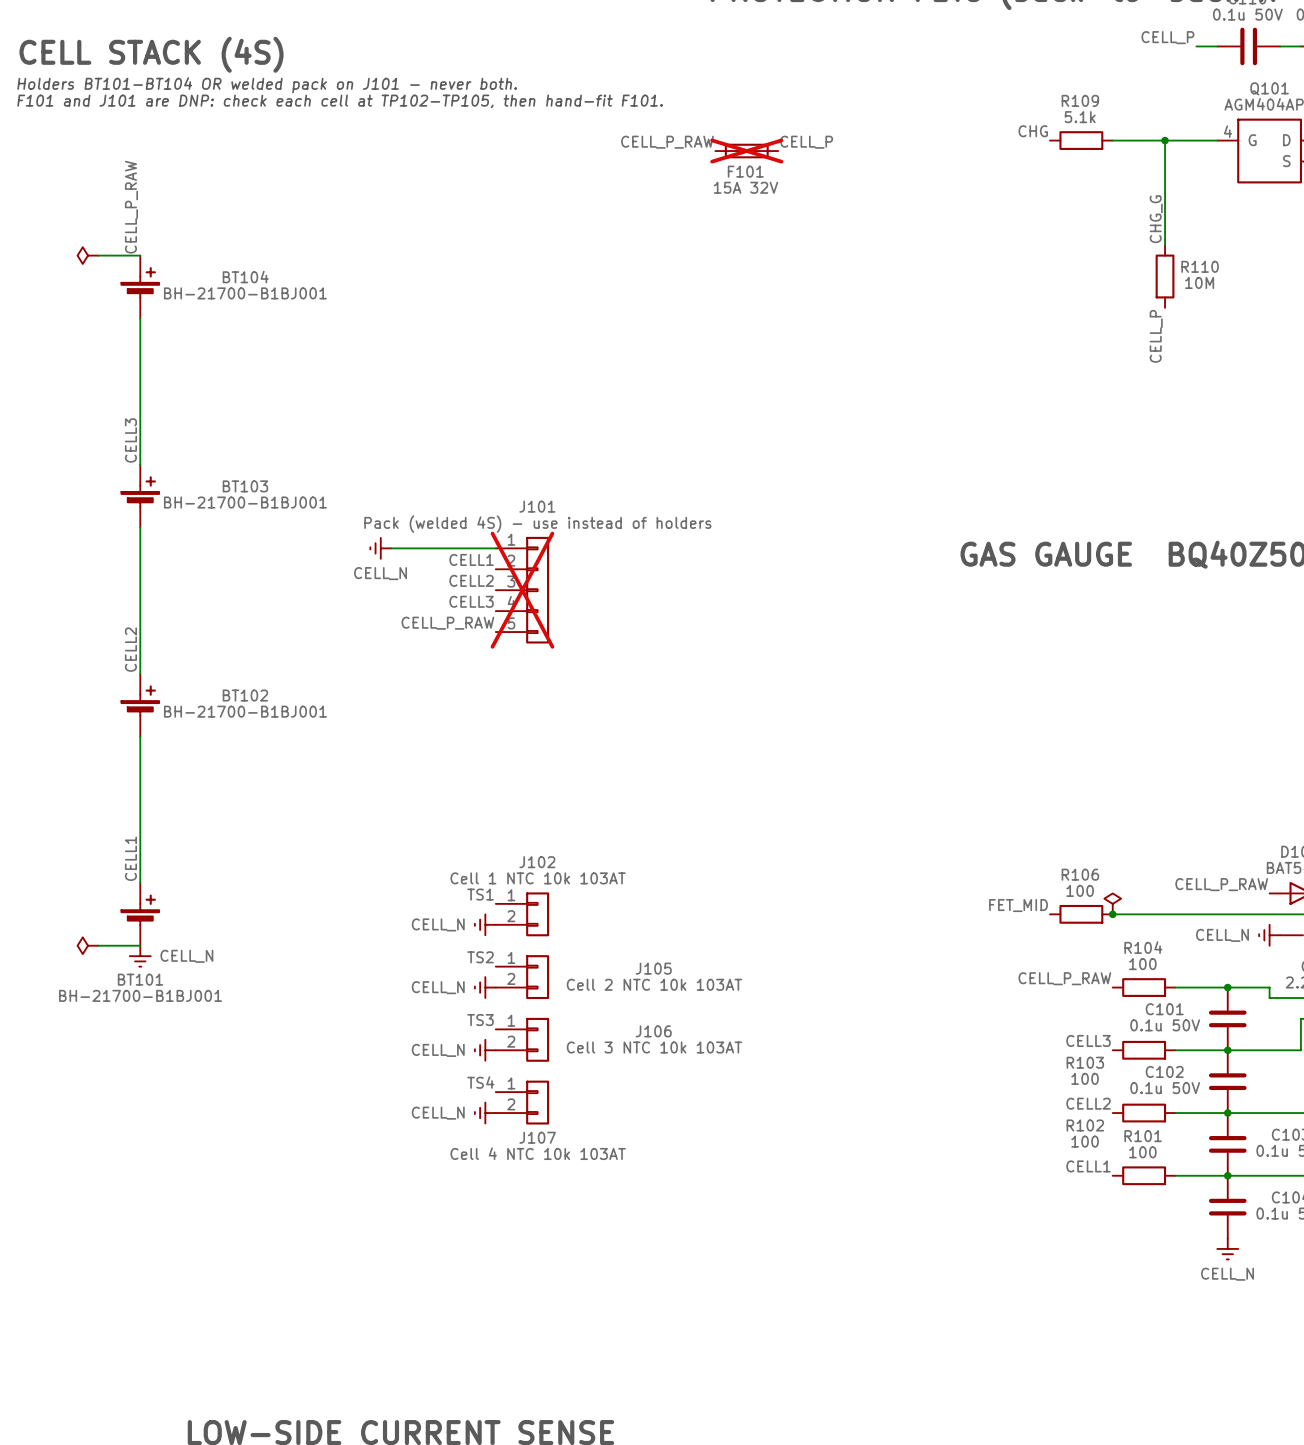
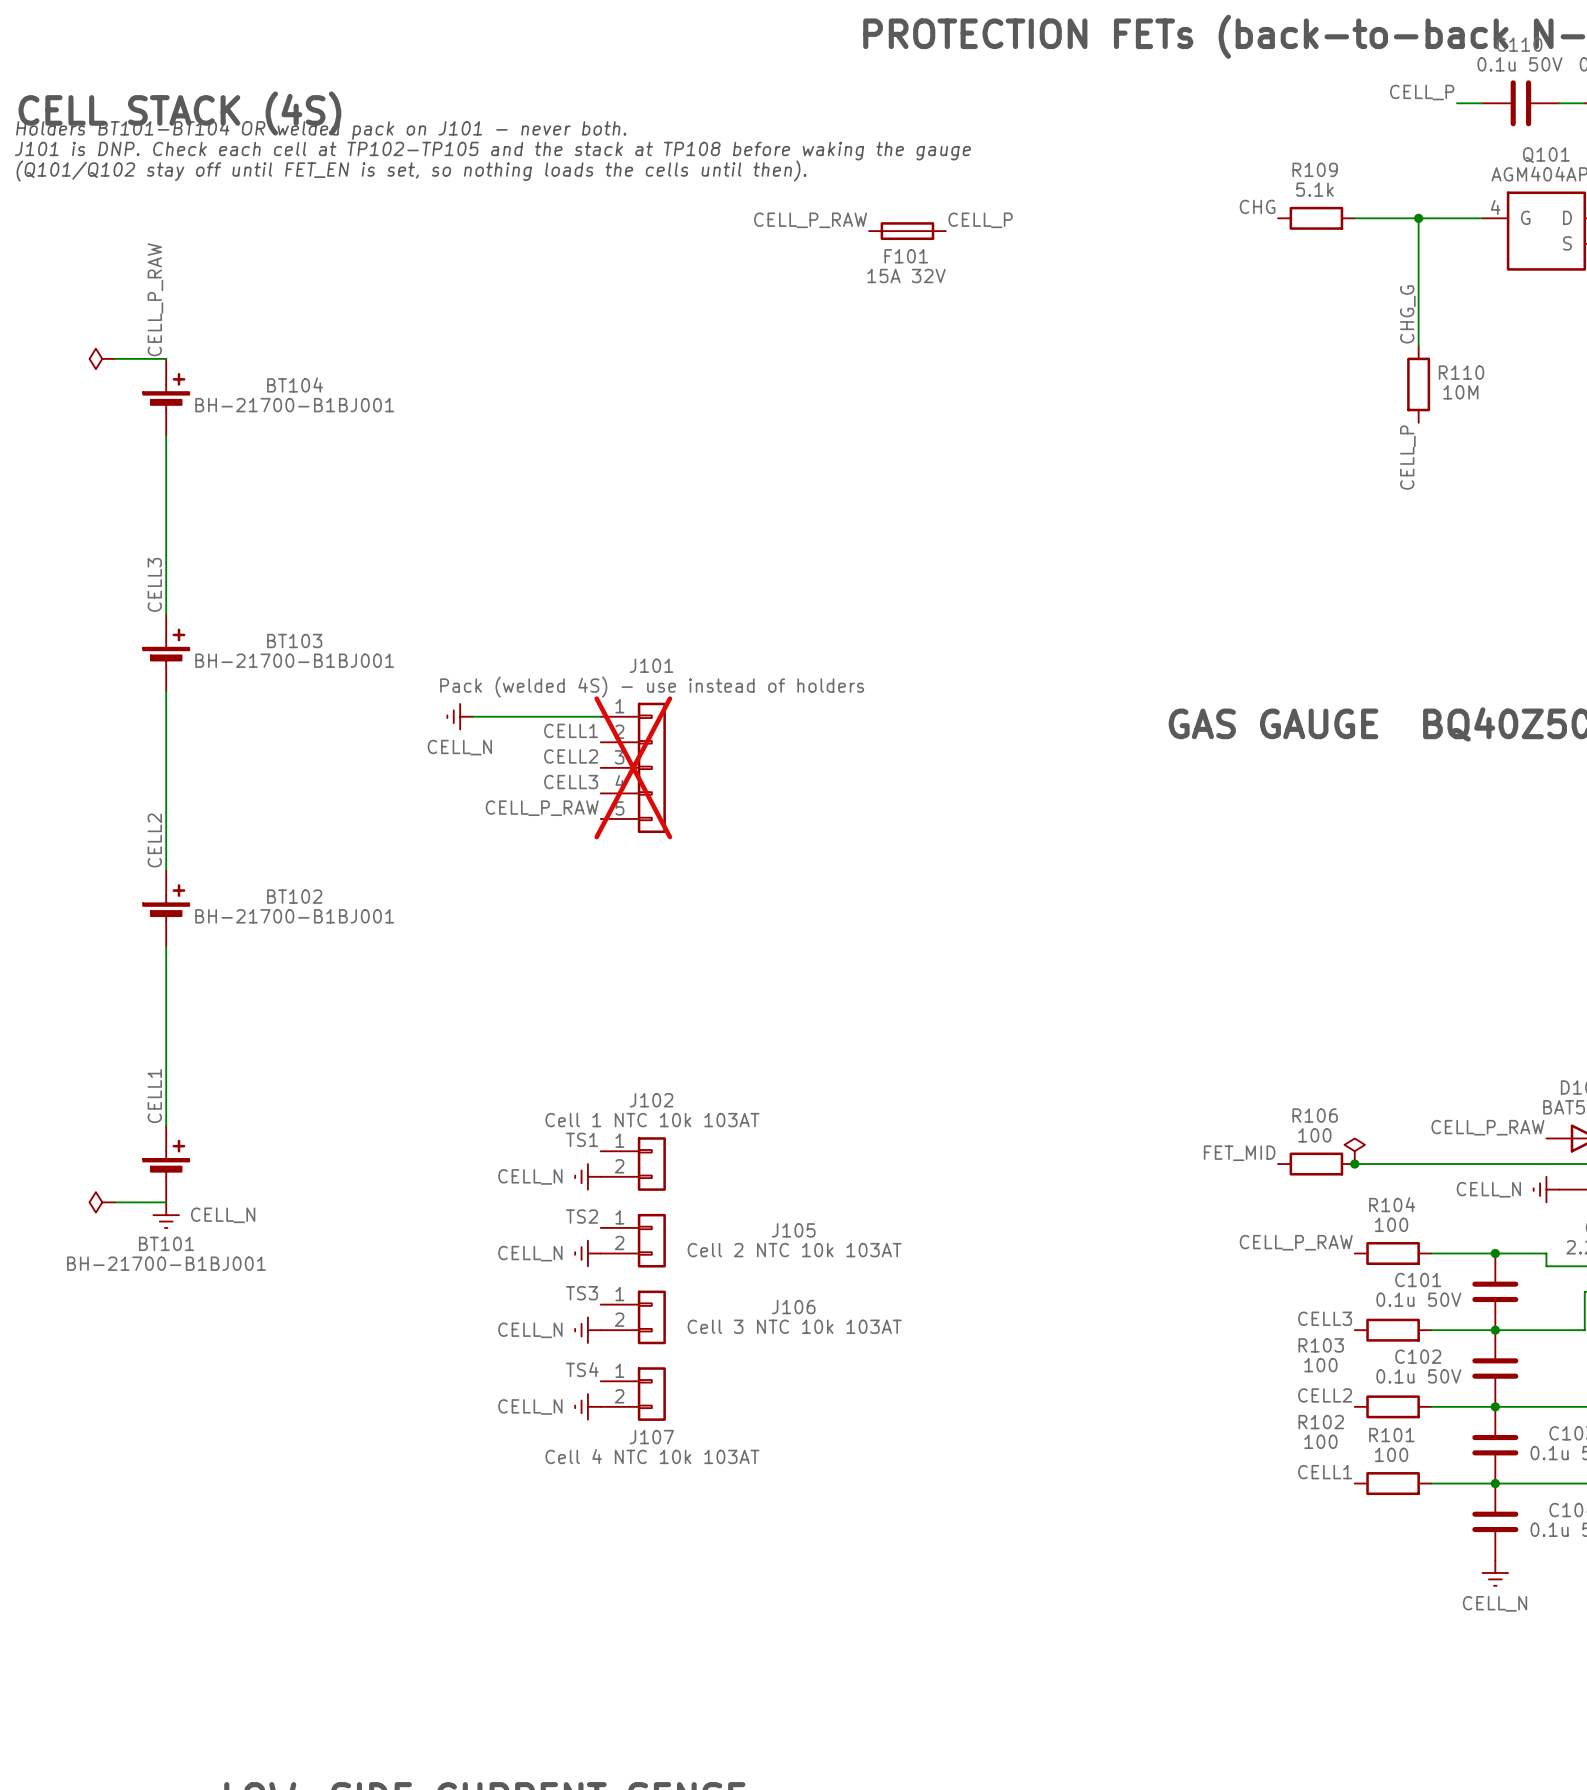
text: none -> Holders BT101-BT104 OR welded pack on J101 - never both. (321, 130)
text: Holders BT101-BT104 OR welded pack on J101 - never both. (267, 85) -> J101 is DNP. Check each cell at TP102-TP105 and the stack at TP108 before waking the gauge (492, 151)
text: F101 and J101 are DNP: check each cell at TP102-TP105, then hand-fit F101. (340, 101) -> (Q101/Q102 stay off until FET_EN is set, so nothing loads the cells until then). (411, 171)
F101 do-not-place cross: (746, 151) -> none

